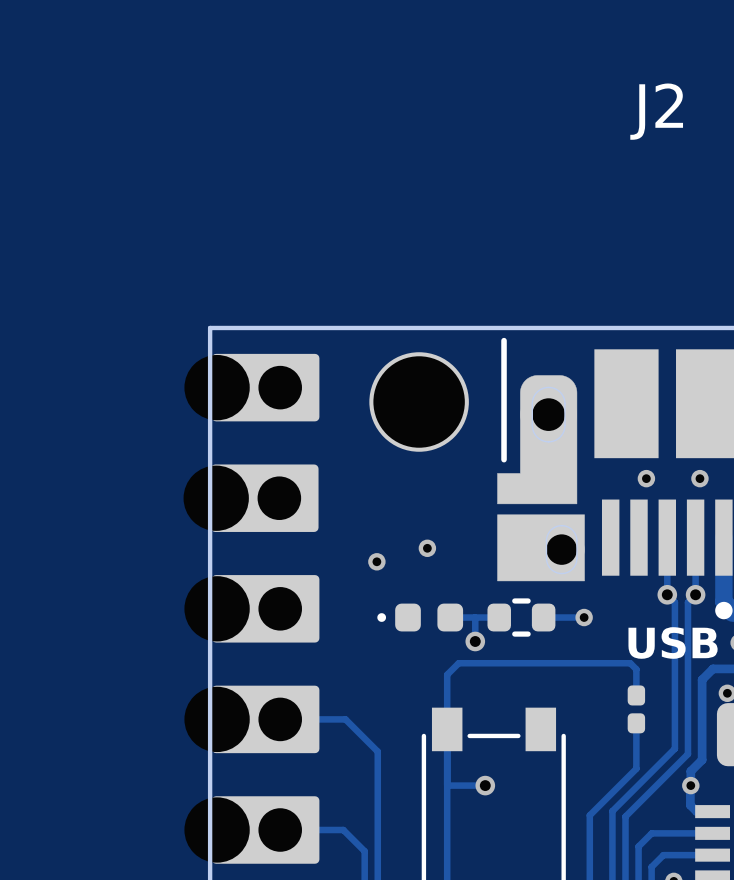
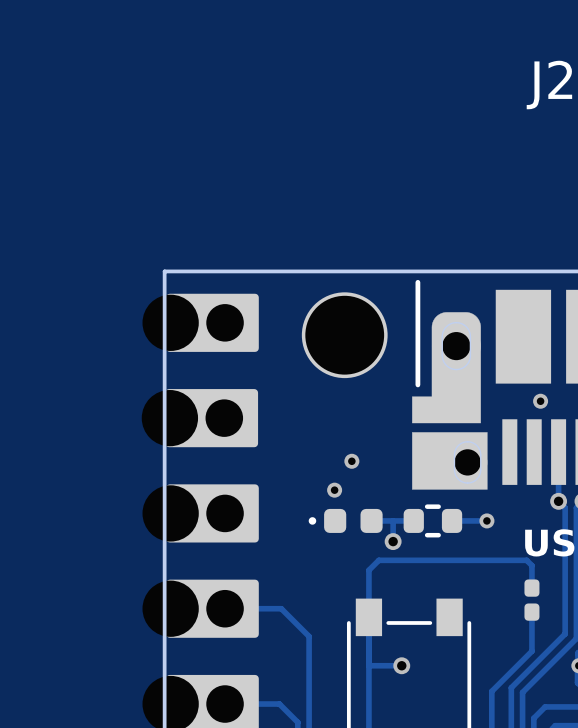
via position: (376, 561) -> (334, 490)

